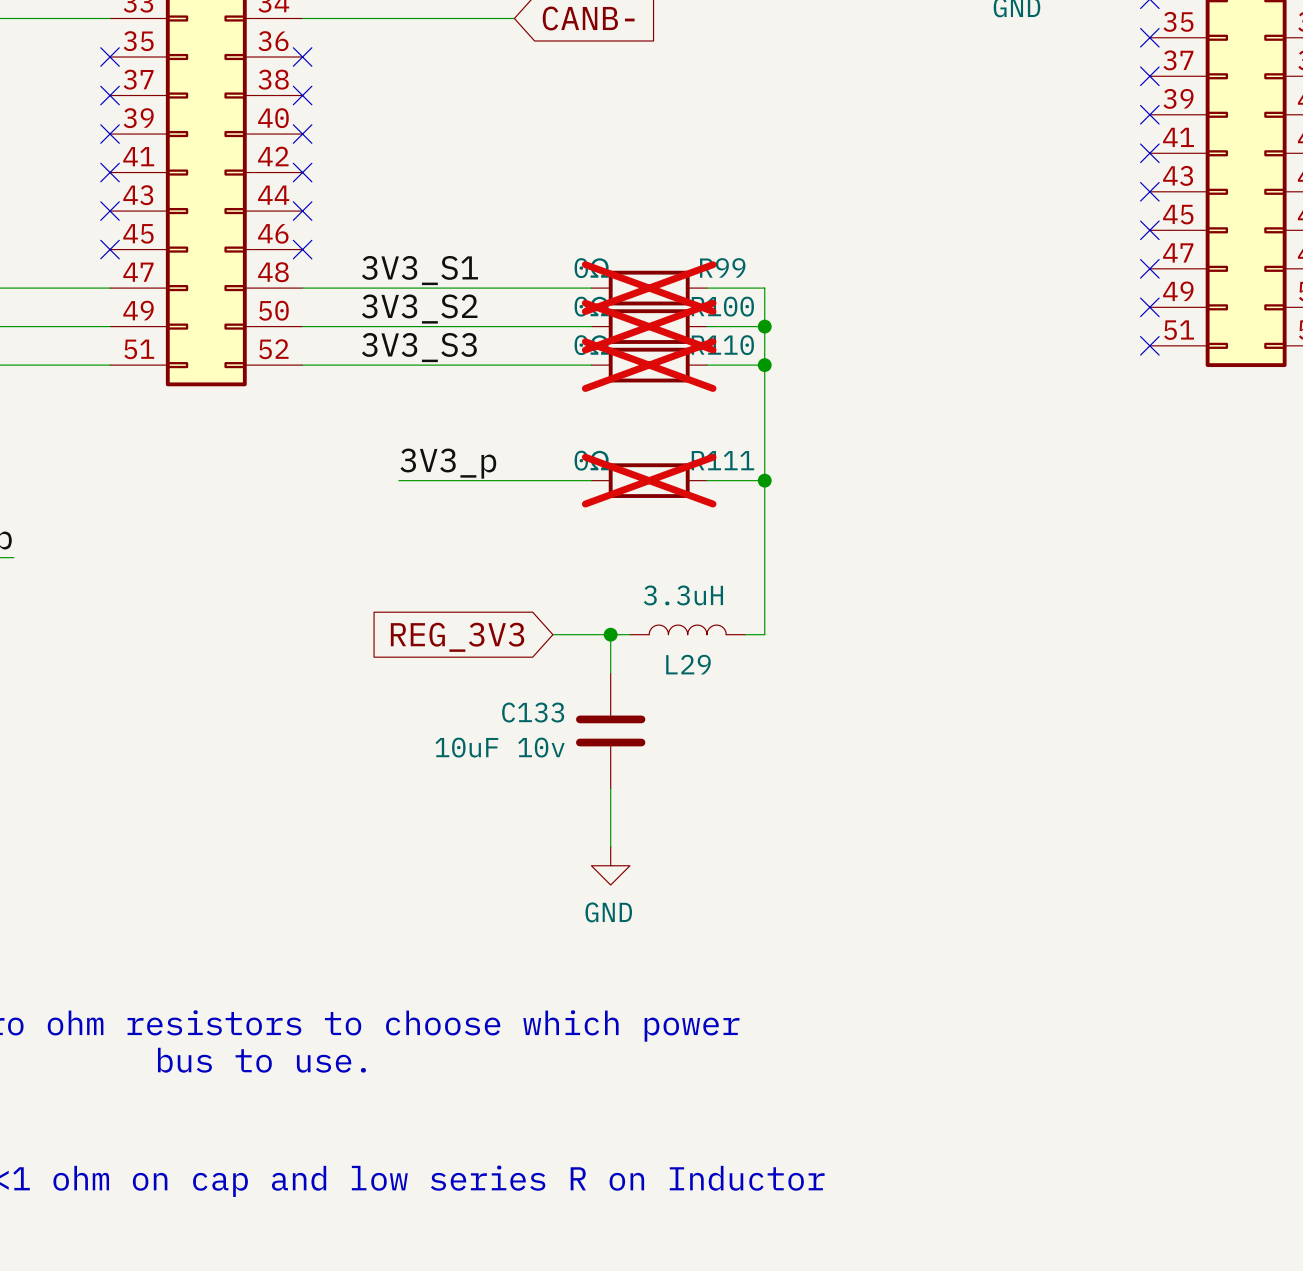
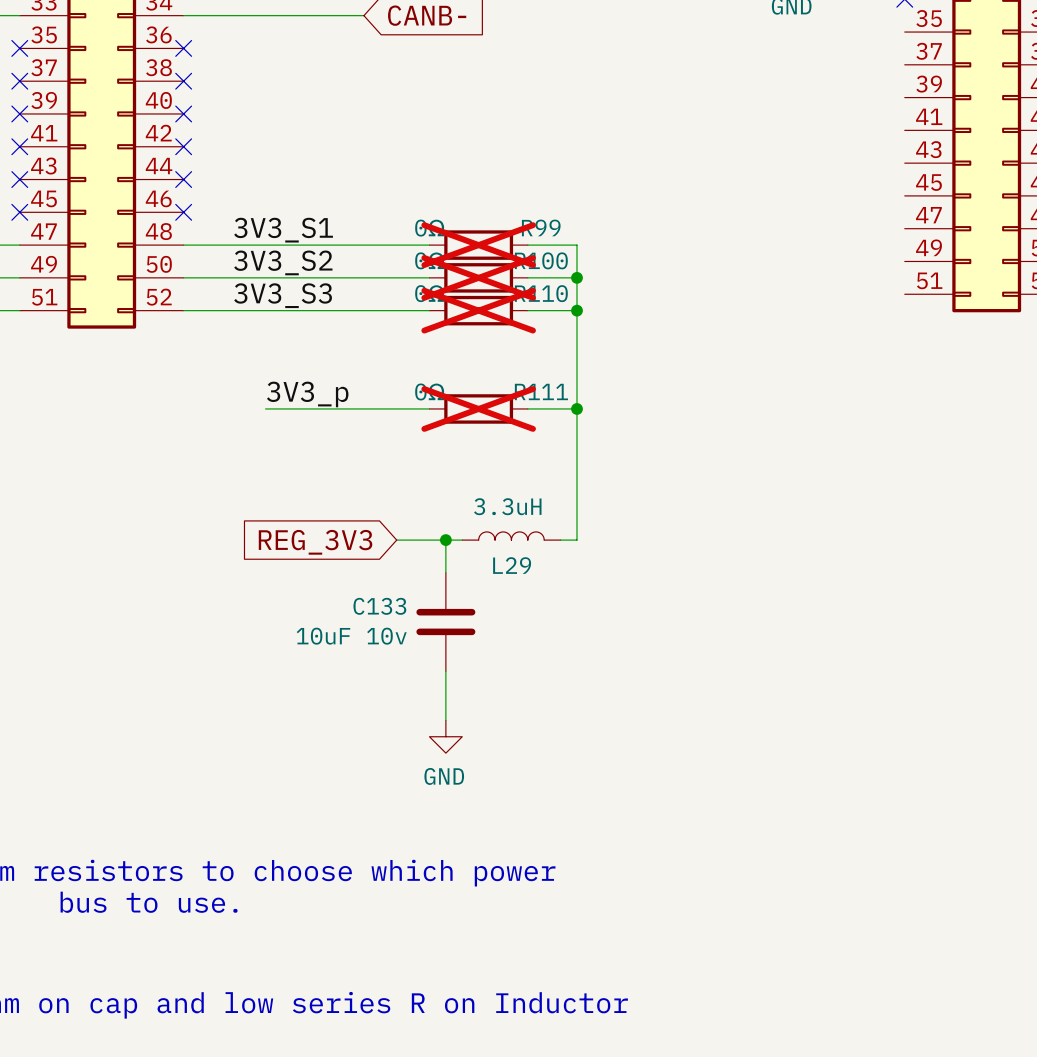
no-connect mark: (1149, 37) -> none
no-connect mark: (1149, 76) -> none
no-connect mark: (1149, 114) -> none
no-connect mark: (1149, 153) -> none
no-connect mark: (1149, 191) -> none
no-connect mark: (1149, 230) -> none
no-connect mark: (1149, 268) -> none
no-connect mark: (1149, 307) -> none
no-connect mark: (1149, 345) -> none

